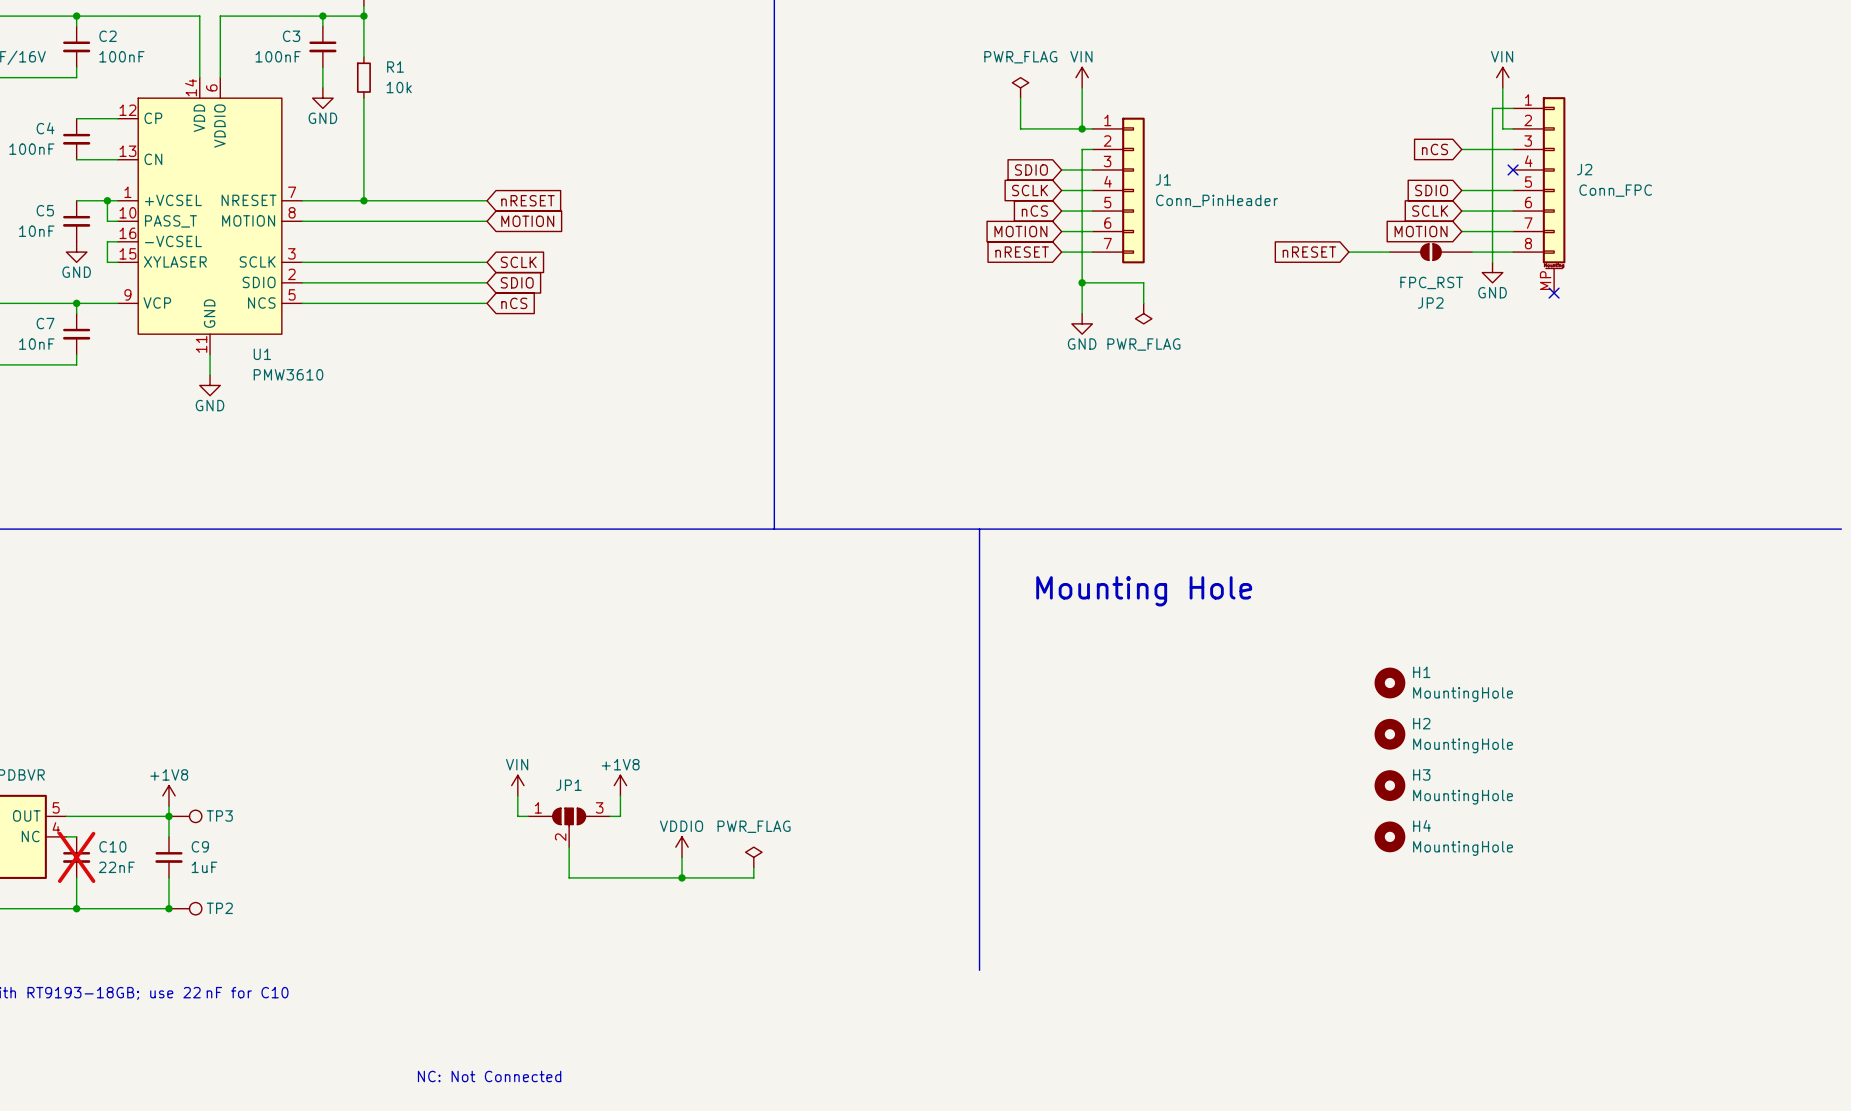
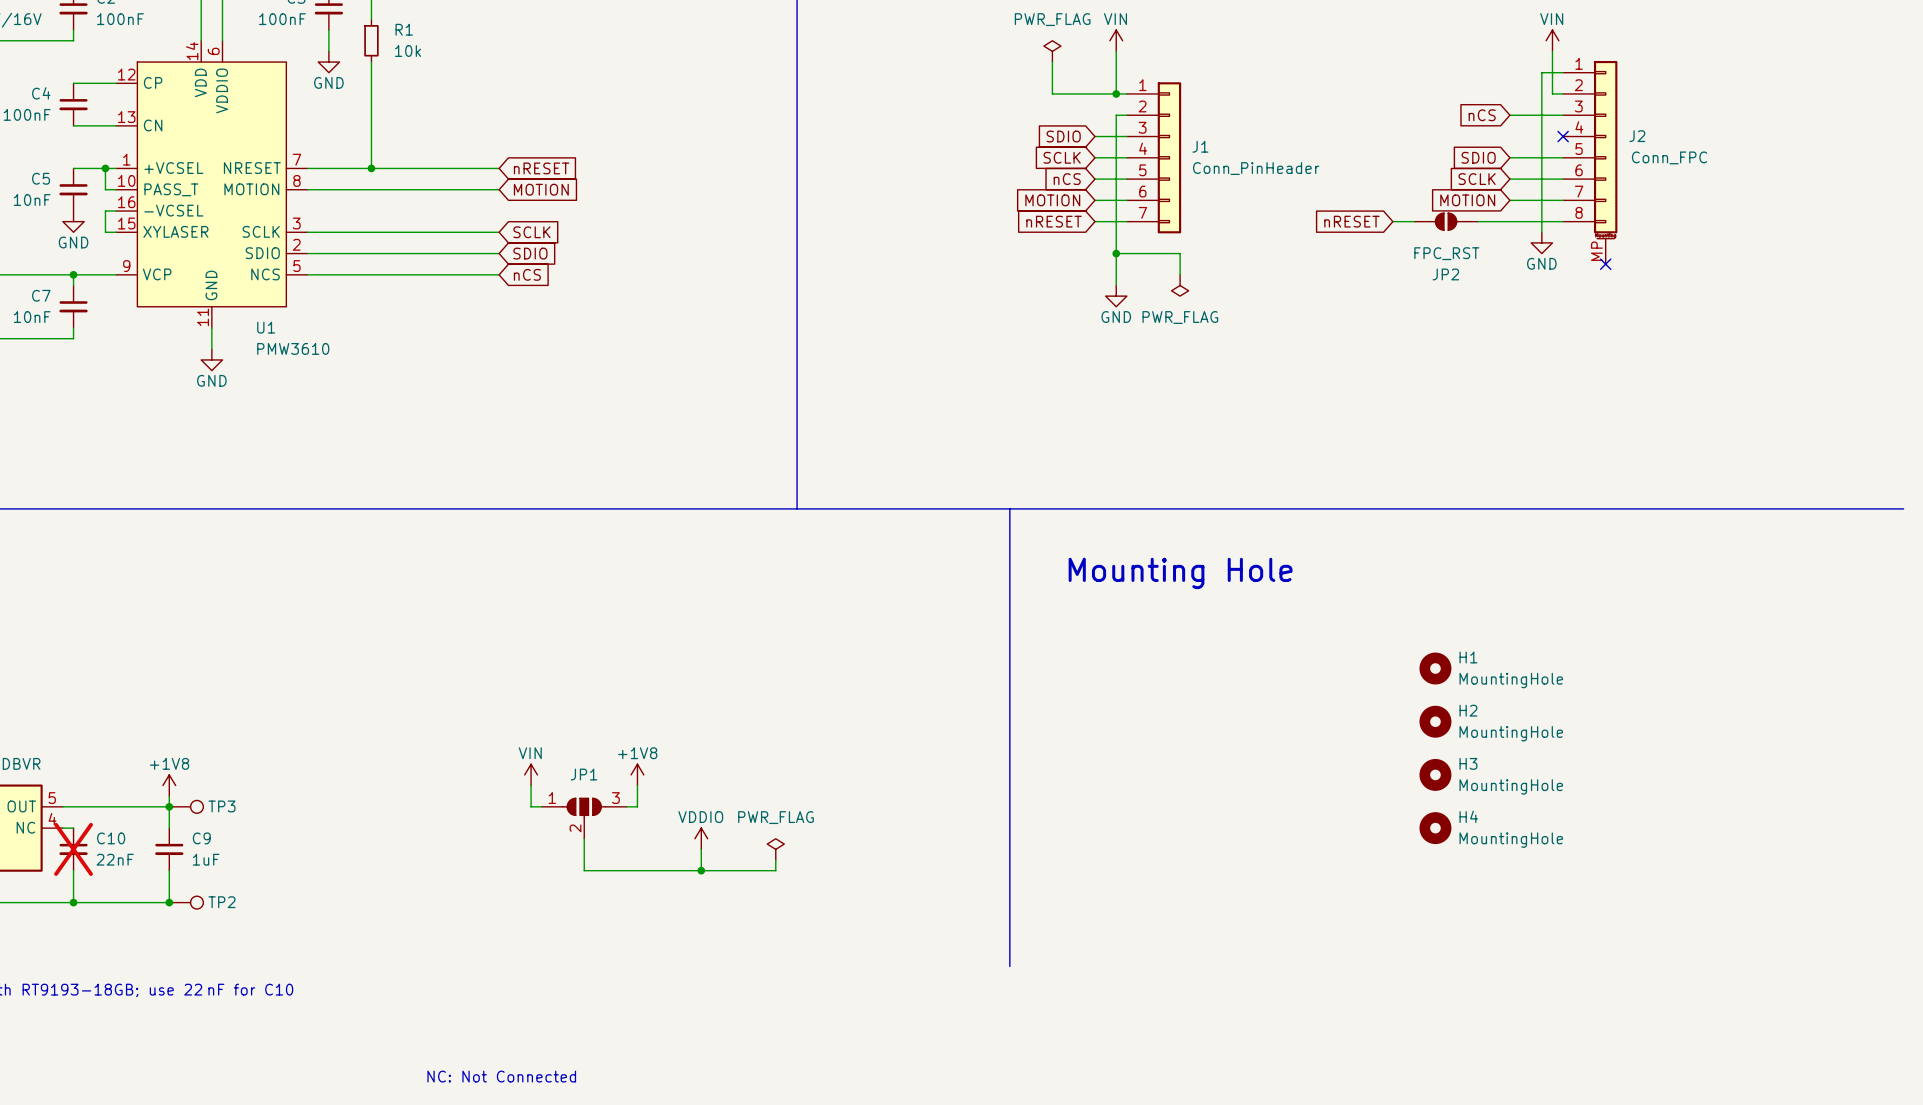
JP2 symbol: [1389, 243, 1473, 261] -> [1414, 213, 1479, 231]

